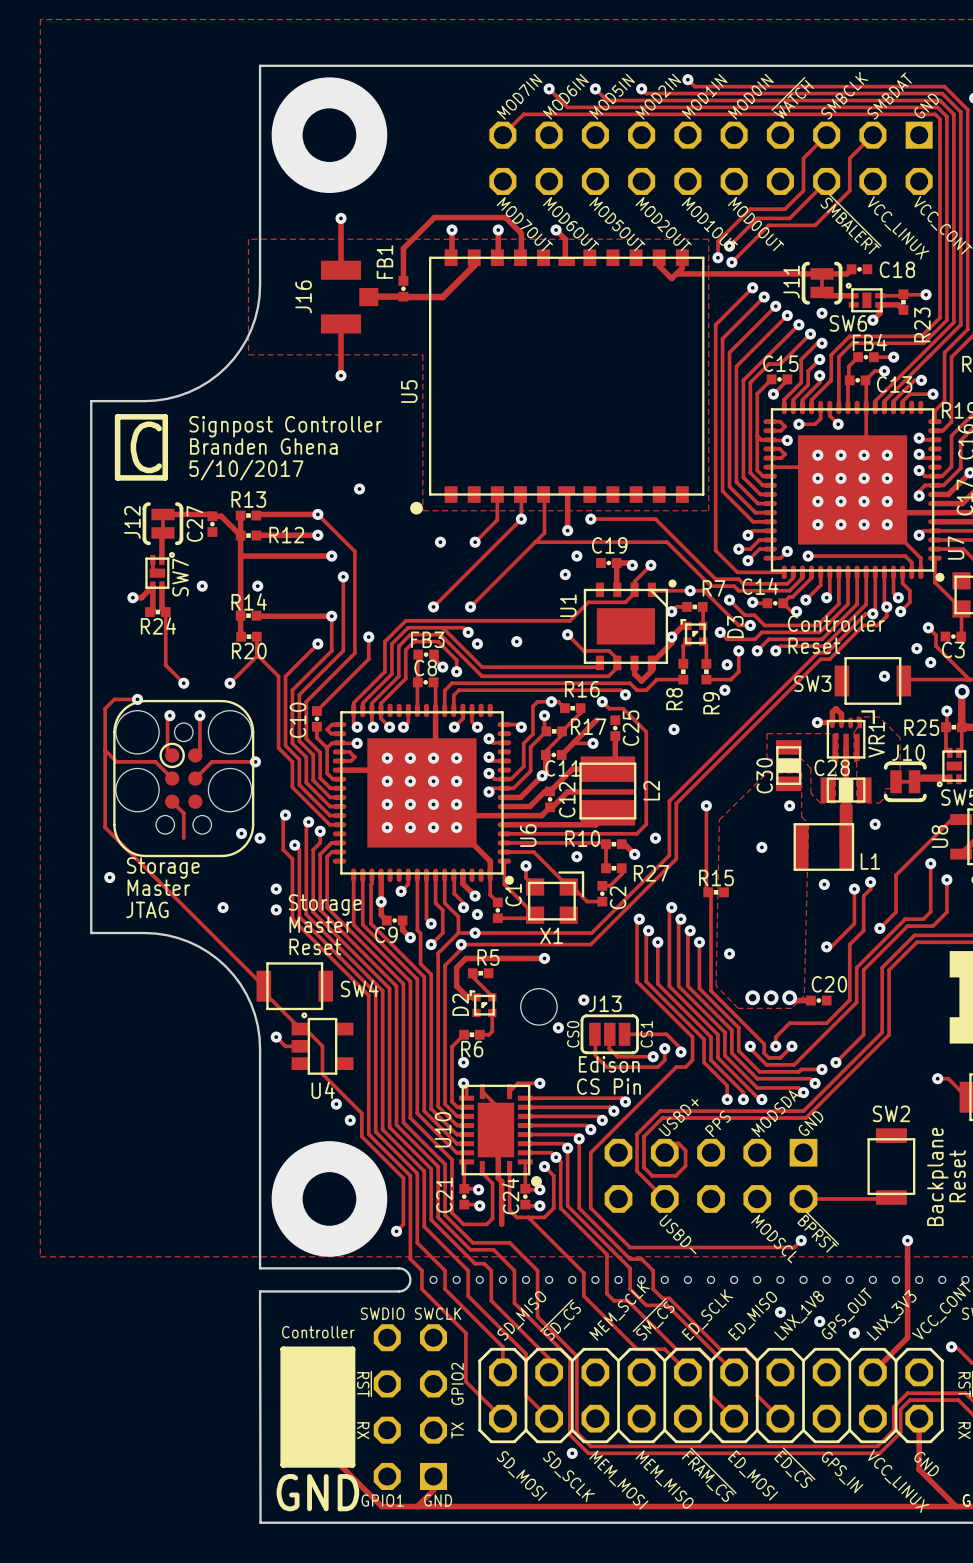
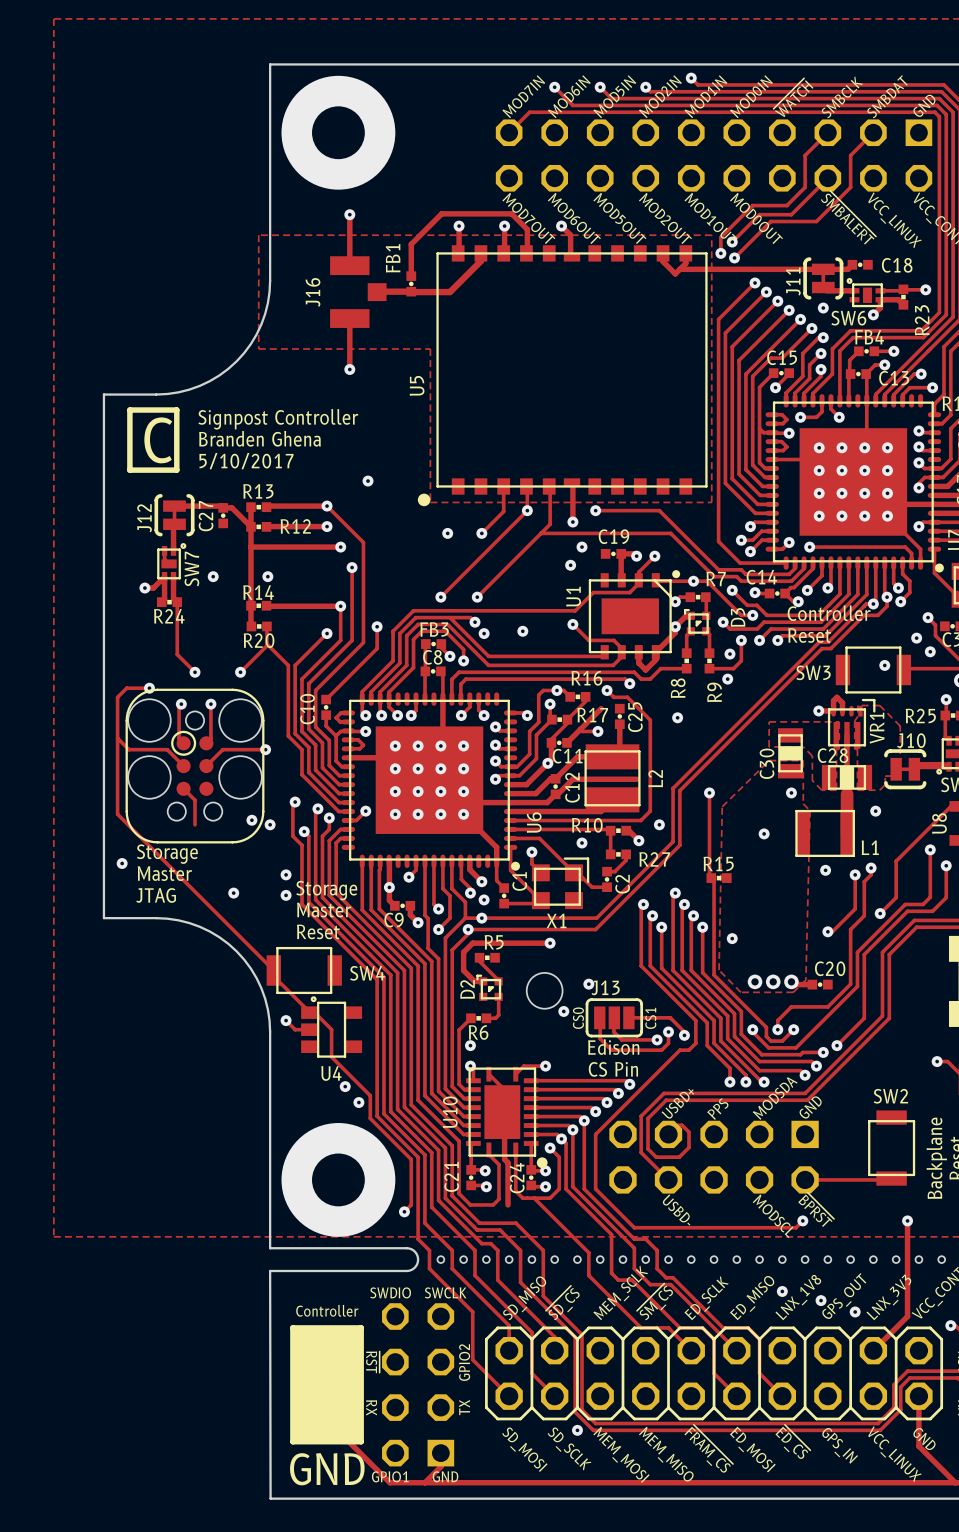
track: none -> (365, 811) (356, 820) (348, 820)
via: none -> (365, 811)

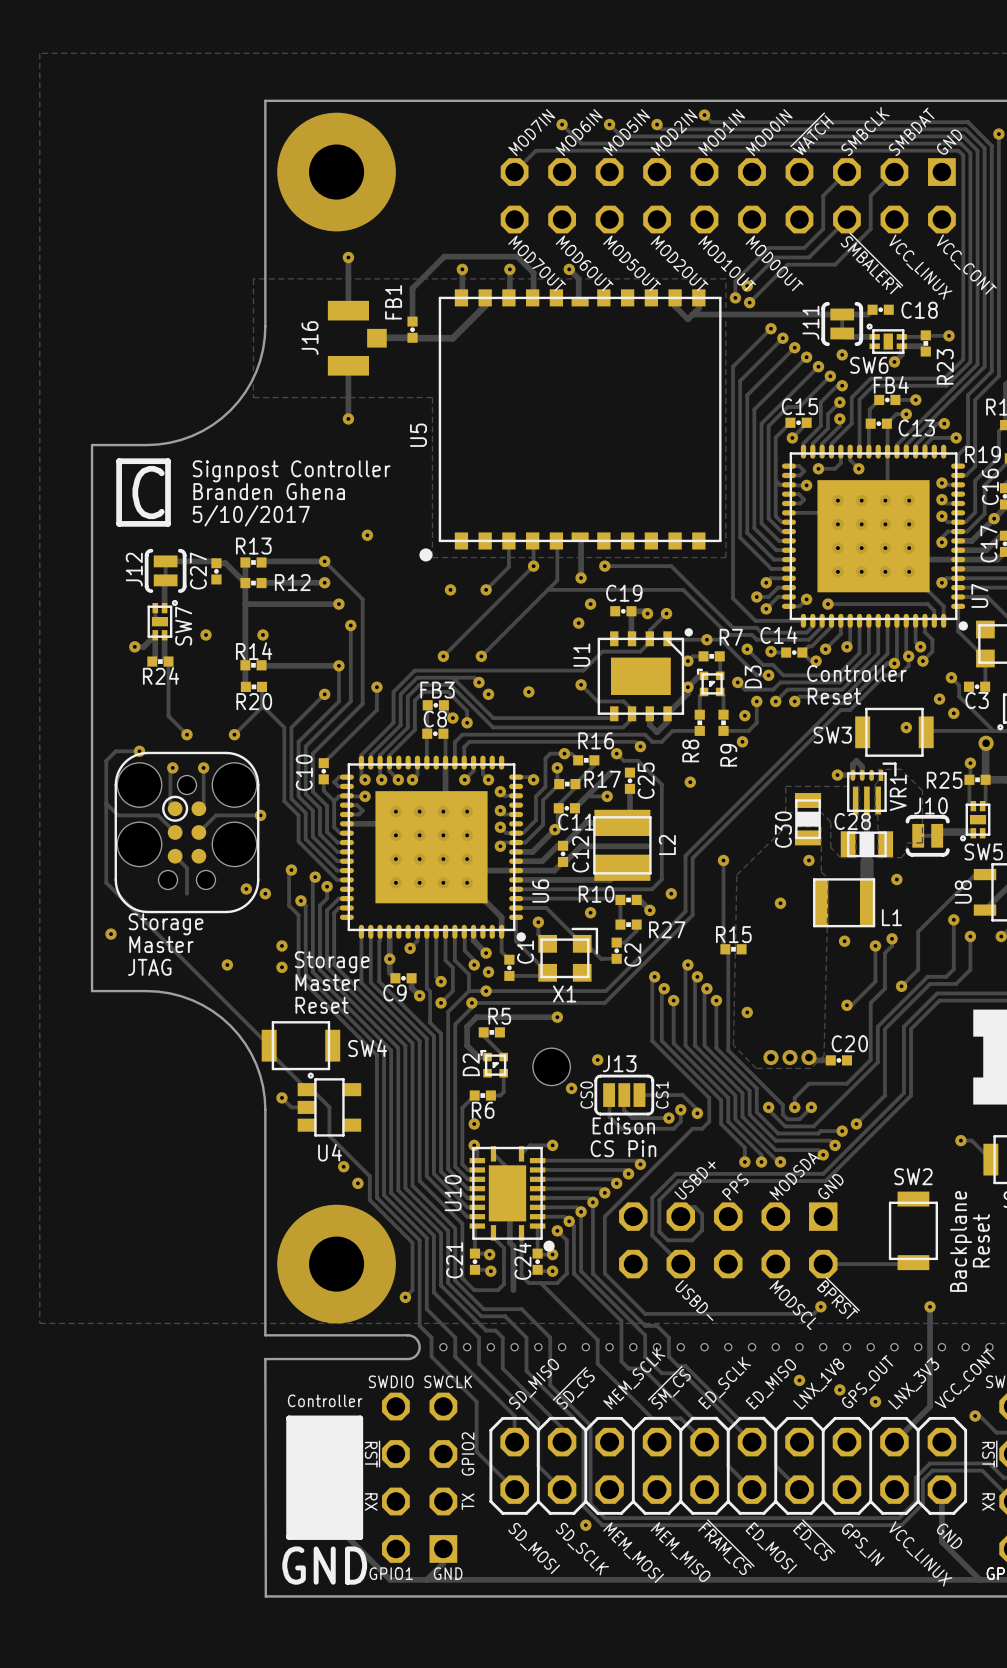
track: (365, 811) (356, 820) (348, 820) -> none
via: (365, 811) -> none

